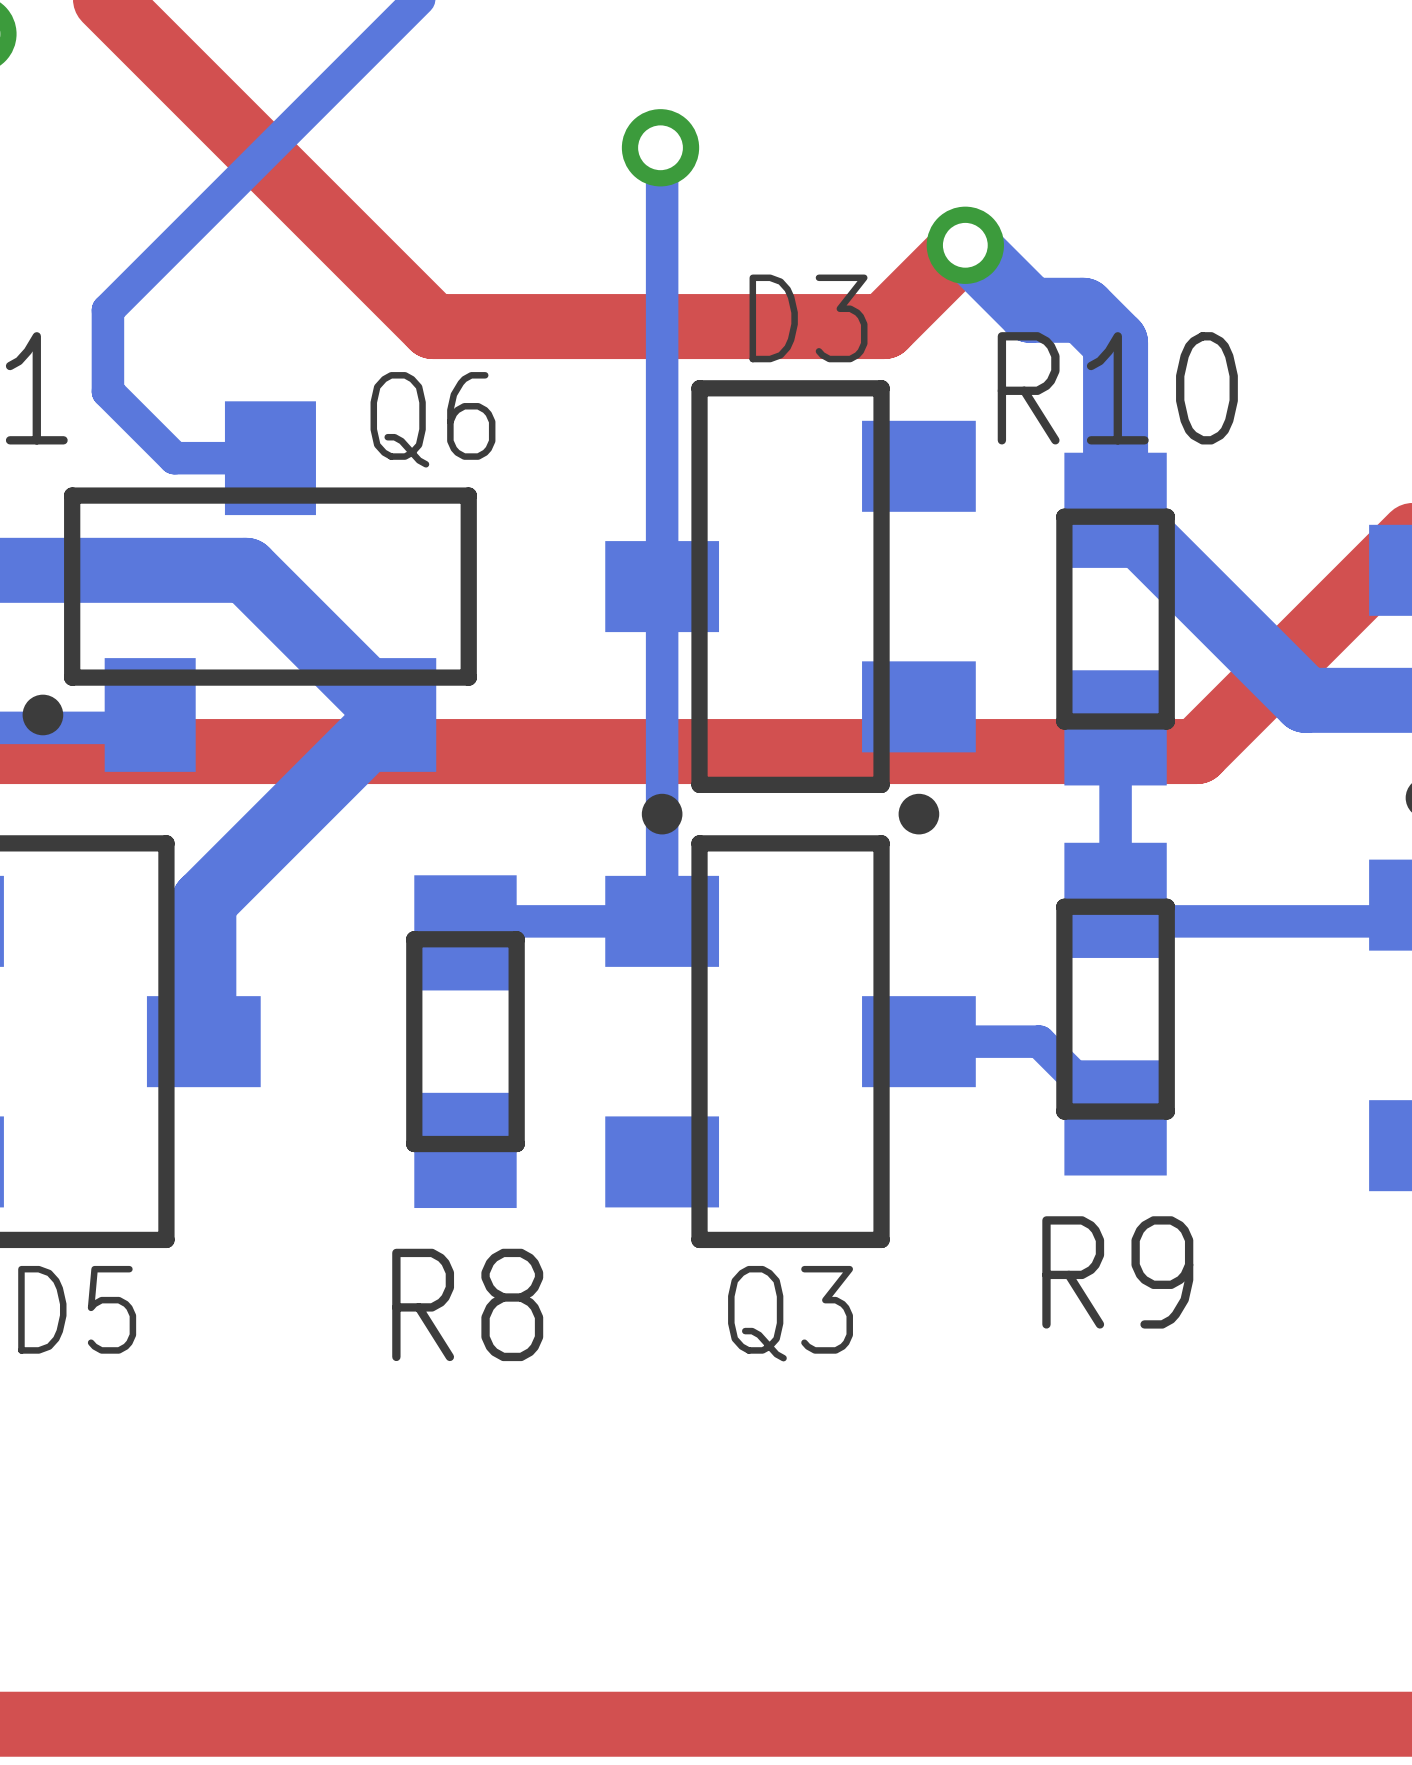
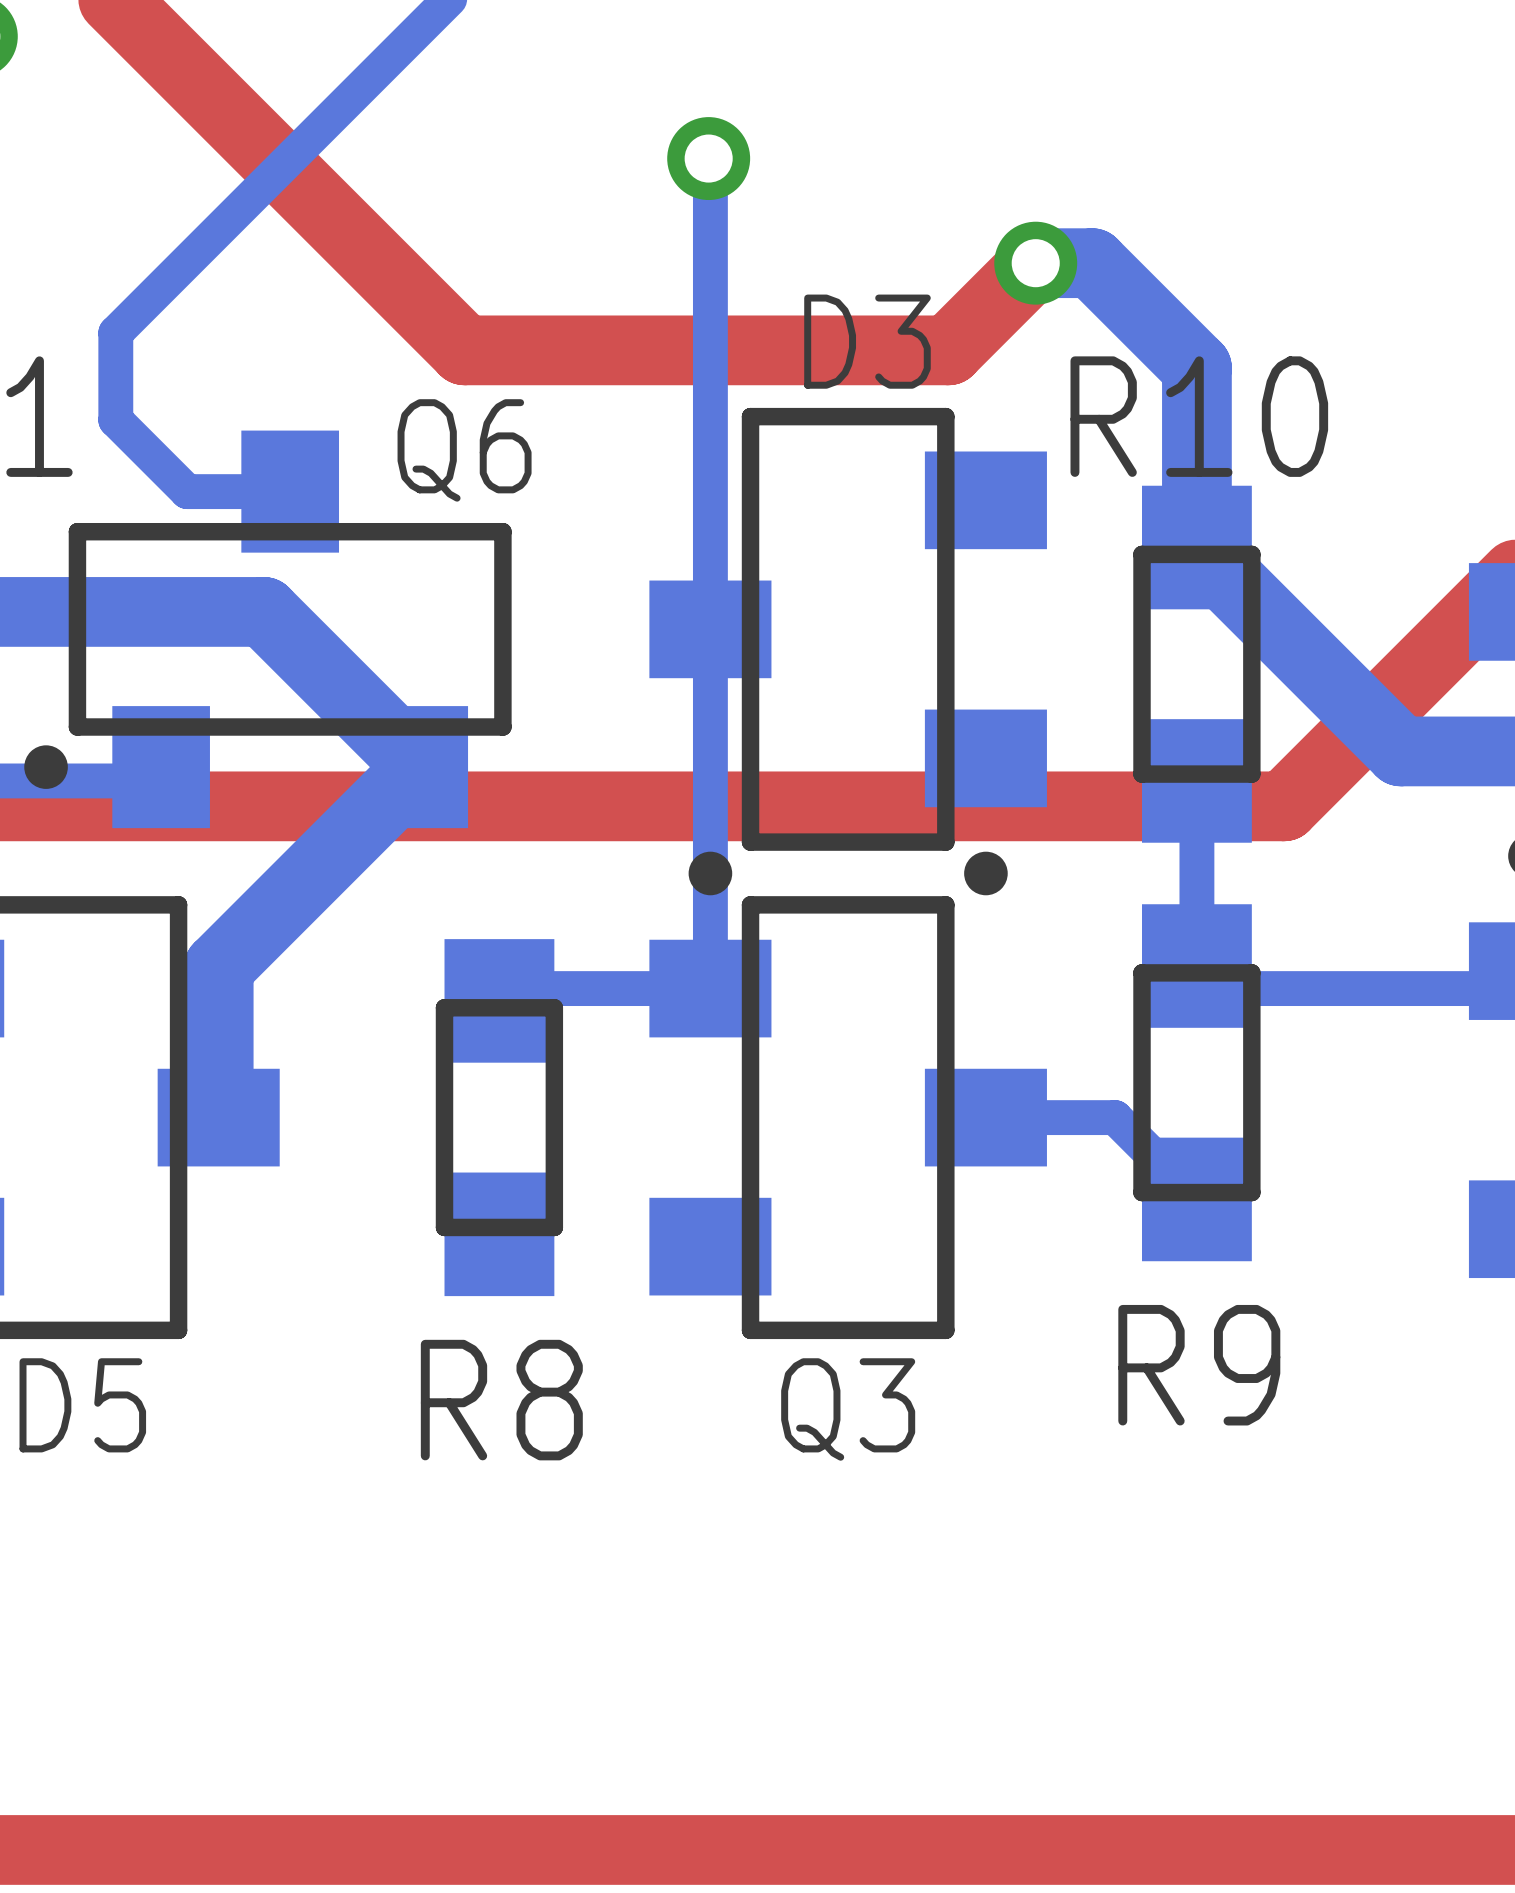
bottom track: (965, 245) (1030, 310) (1083, 310) -> (1035, 263) (1092, 263) (1162, 332)

